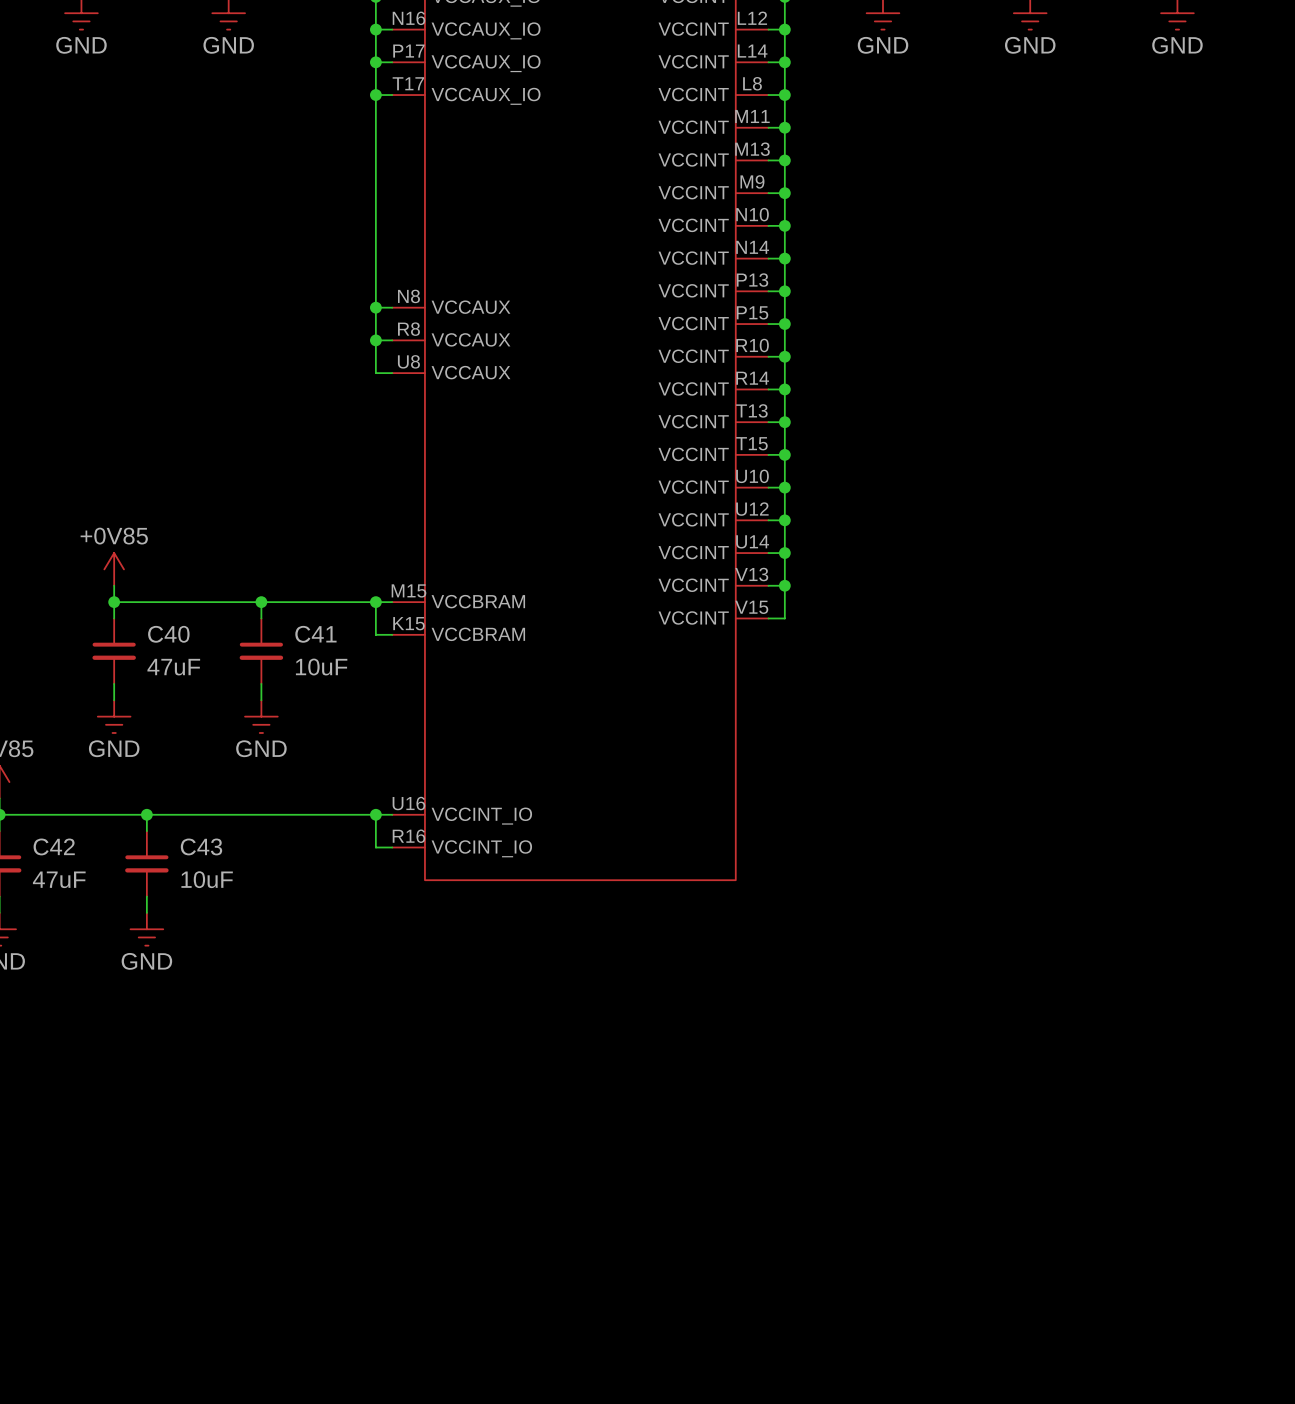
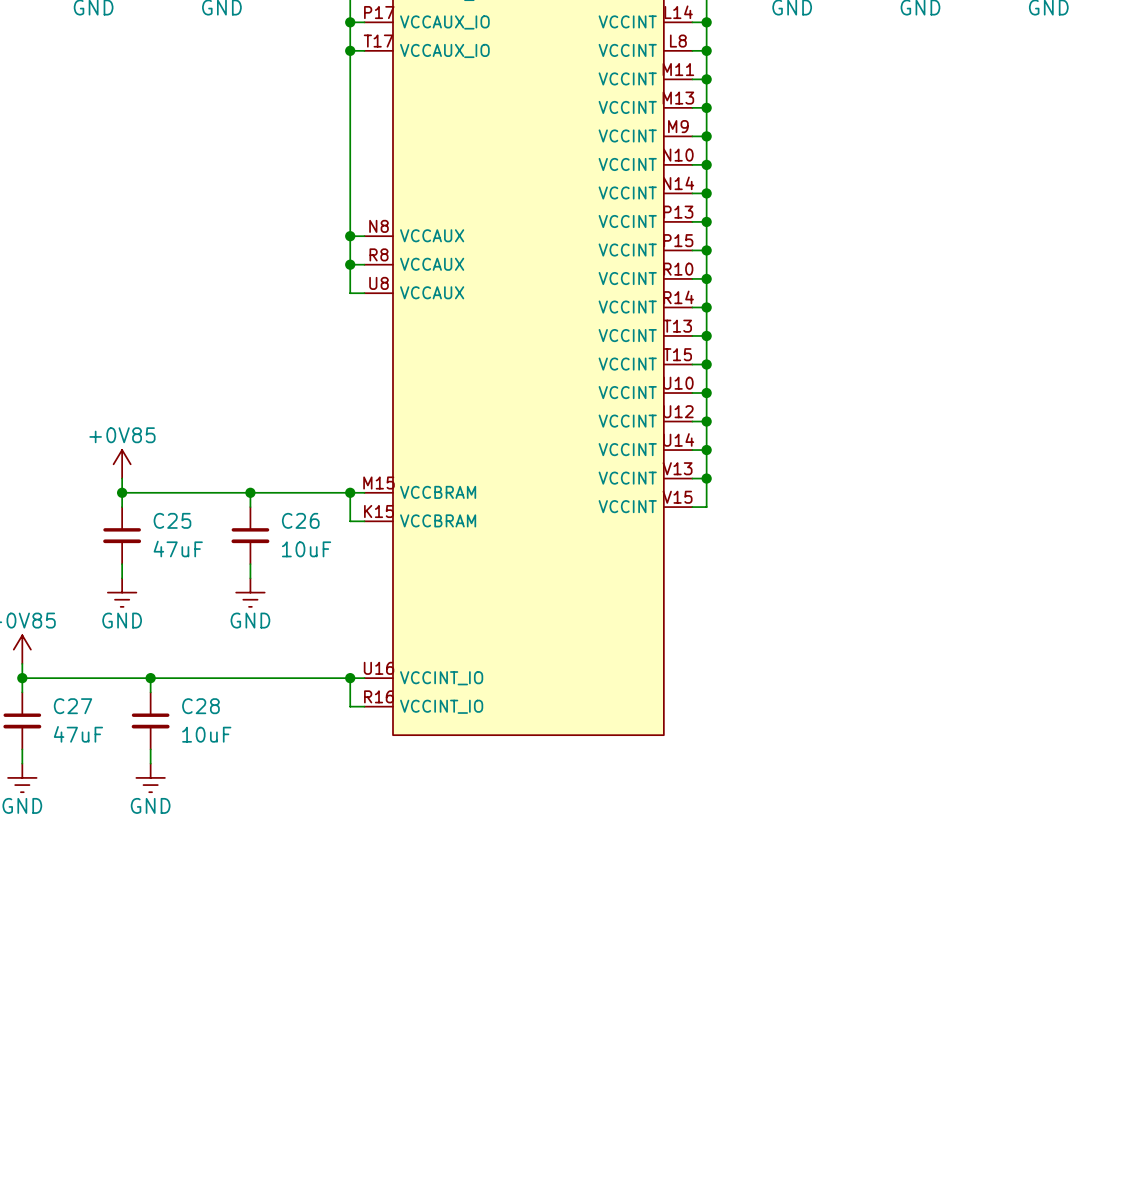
C40 name: C40 (168, 634) -> C25 (172, 520)
C41 name: C41 (315, 634) -> C26 (300, 520)
C42 name: C42 (54, 846) -> C27 (73, 706)
C43 name: C43 (201, 846) -> C28 (200, 706)

